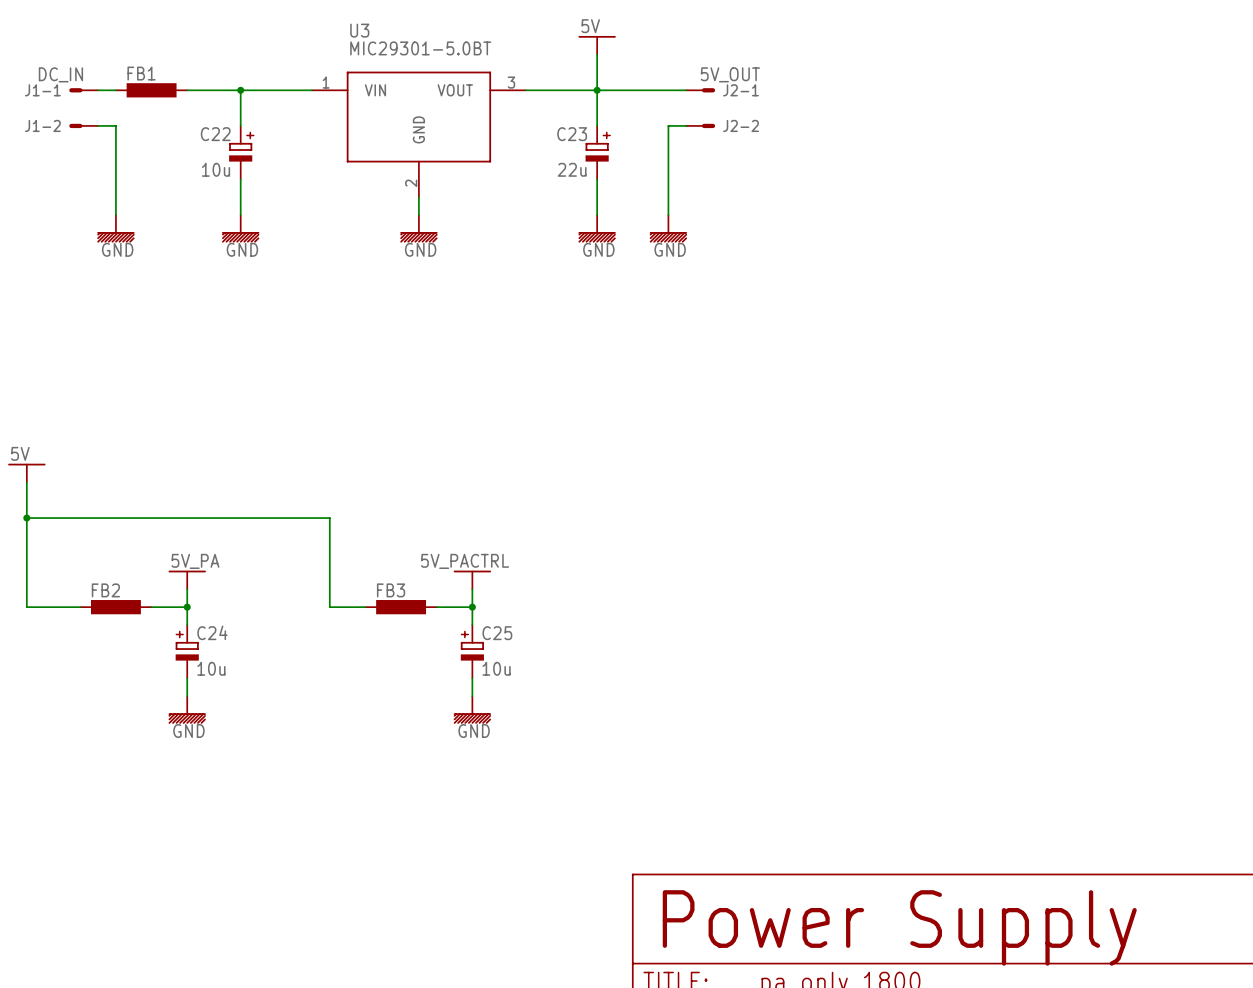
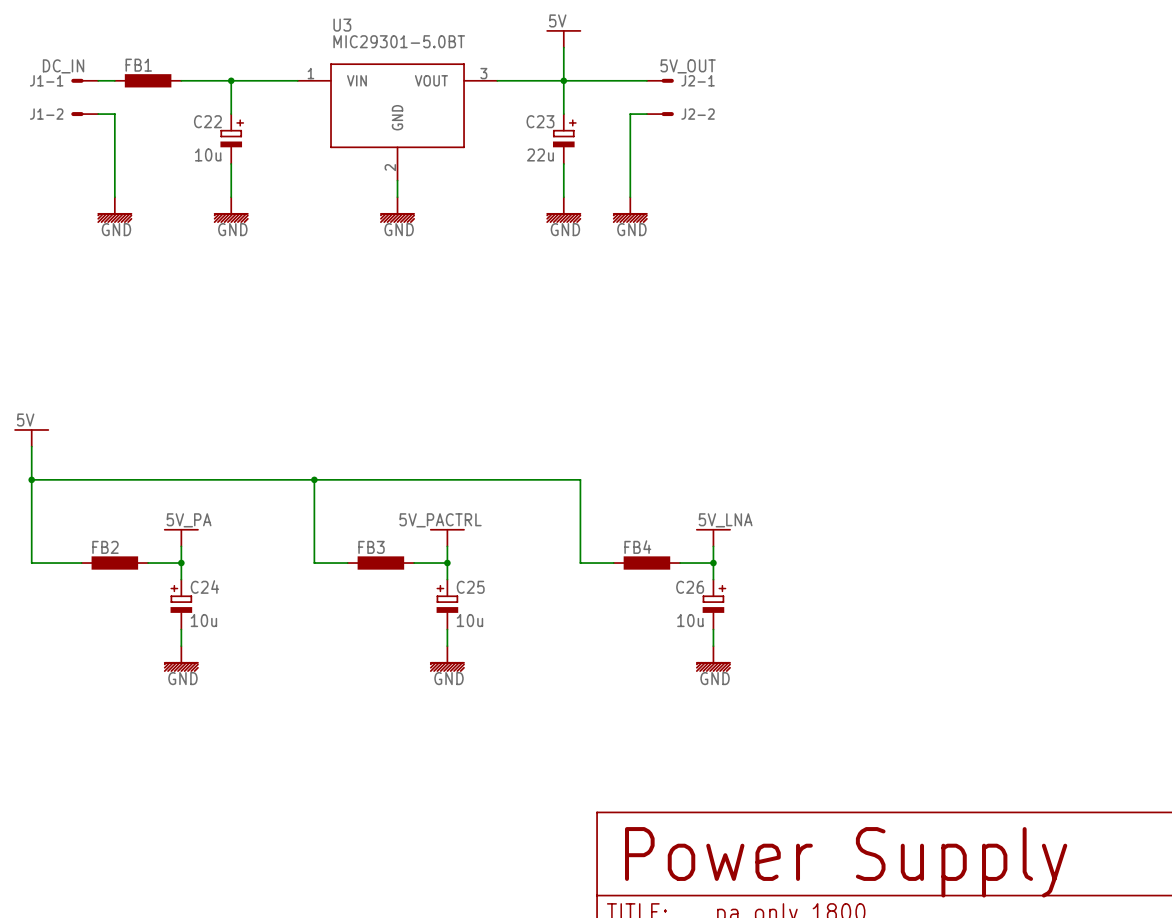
wire: none -> (314, 479) (580, 479) (580, 563) (613, 563)
junction: none -> (314, 479)
power symbol: none -> 5V_LNA (713, 537)
wire: none -> (713, 546) (713, 579)
FB4: none -> (646, 563)
wire: none -> (680, 563) (713, 563)
junction: none -> (713, 563)
C26: none -> 10u (713, 604)
wire: none -> (713, 629) (713, 646)
power symbol: none -> GND (713, 658)

